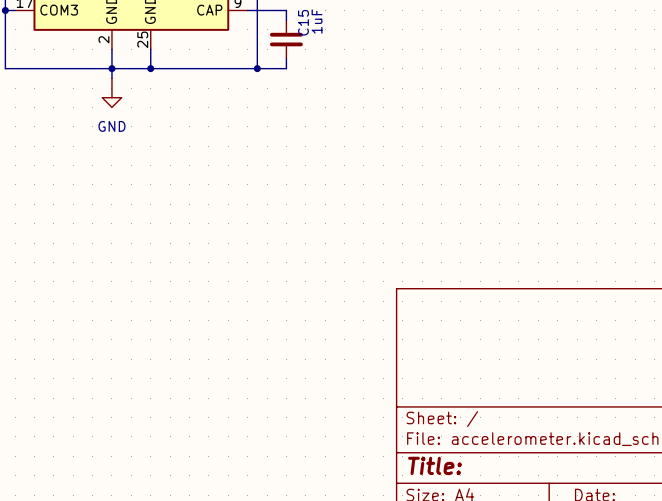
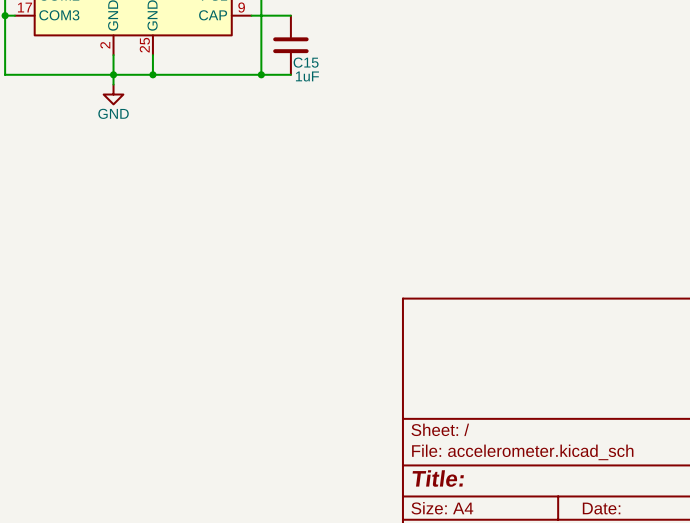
C15 symbol: [269, 20, 303, 59] -> [273, 15, 309, 75]
C15 value position: 1uF (317, 21) -> 1uF (307, 76)
C15 name position: C15 (303, 22) -> C15 (306, 62)
power symbol shape: [102, 78, 122, 108] -> [103, 84, 124, 105]

